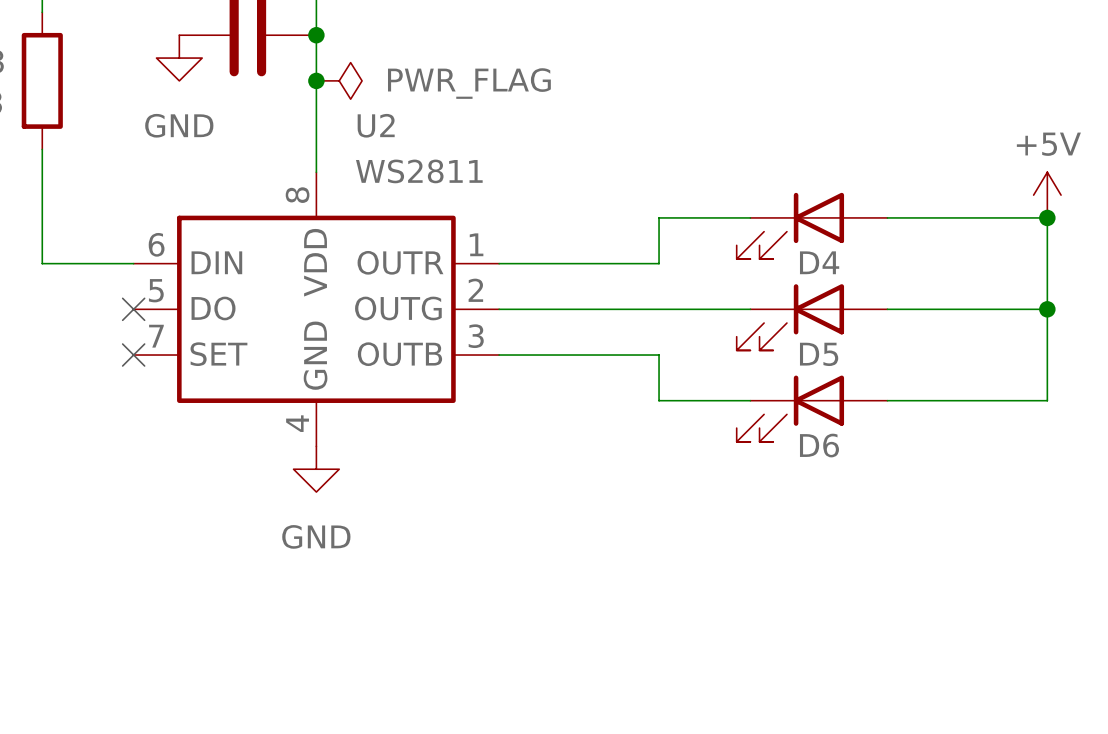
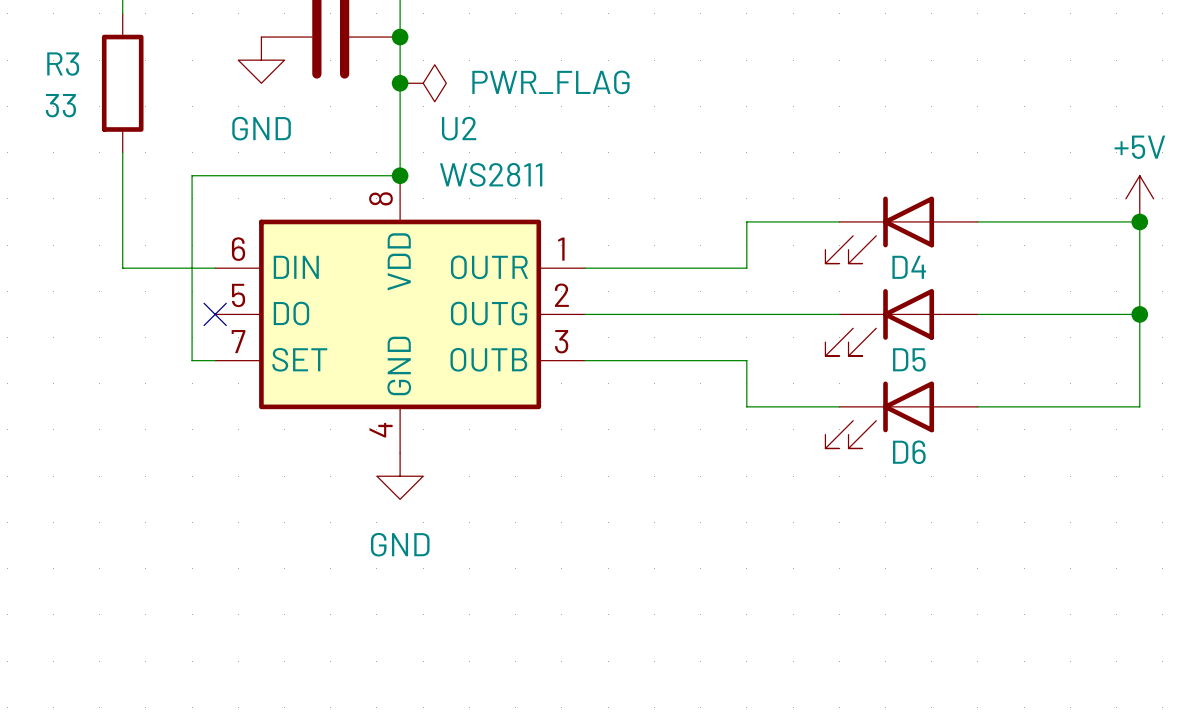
wire: none -> (400, 175) (192, 175) (192, 360) (215, 360)
junction: none -> (400, 175)
no-connect mark: (133, 355) -> none

